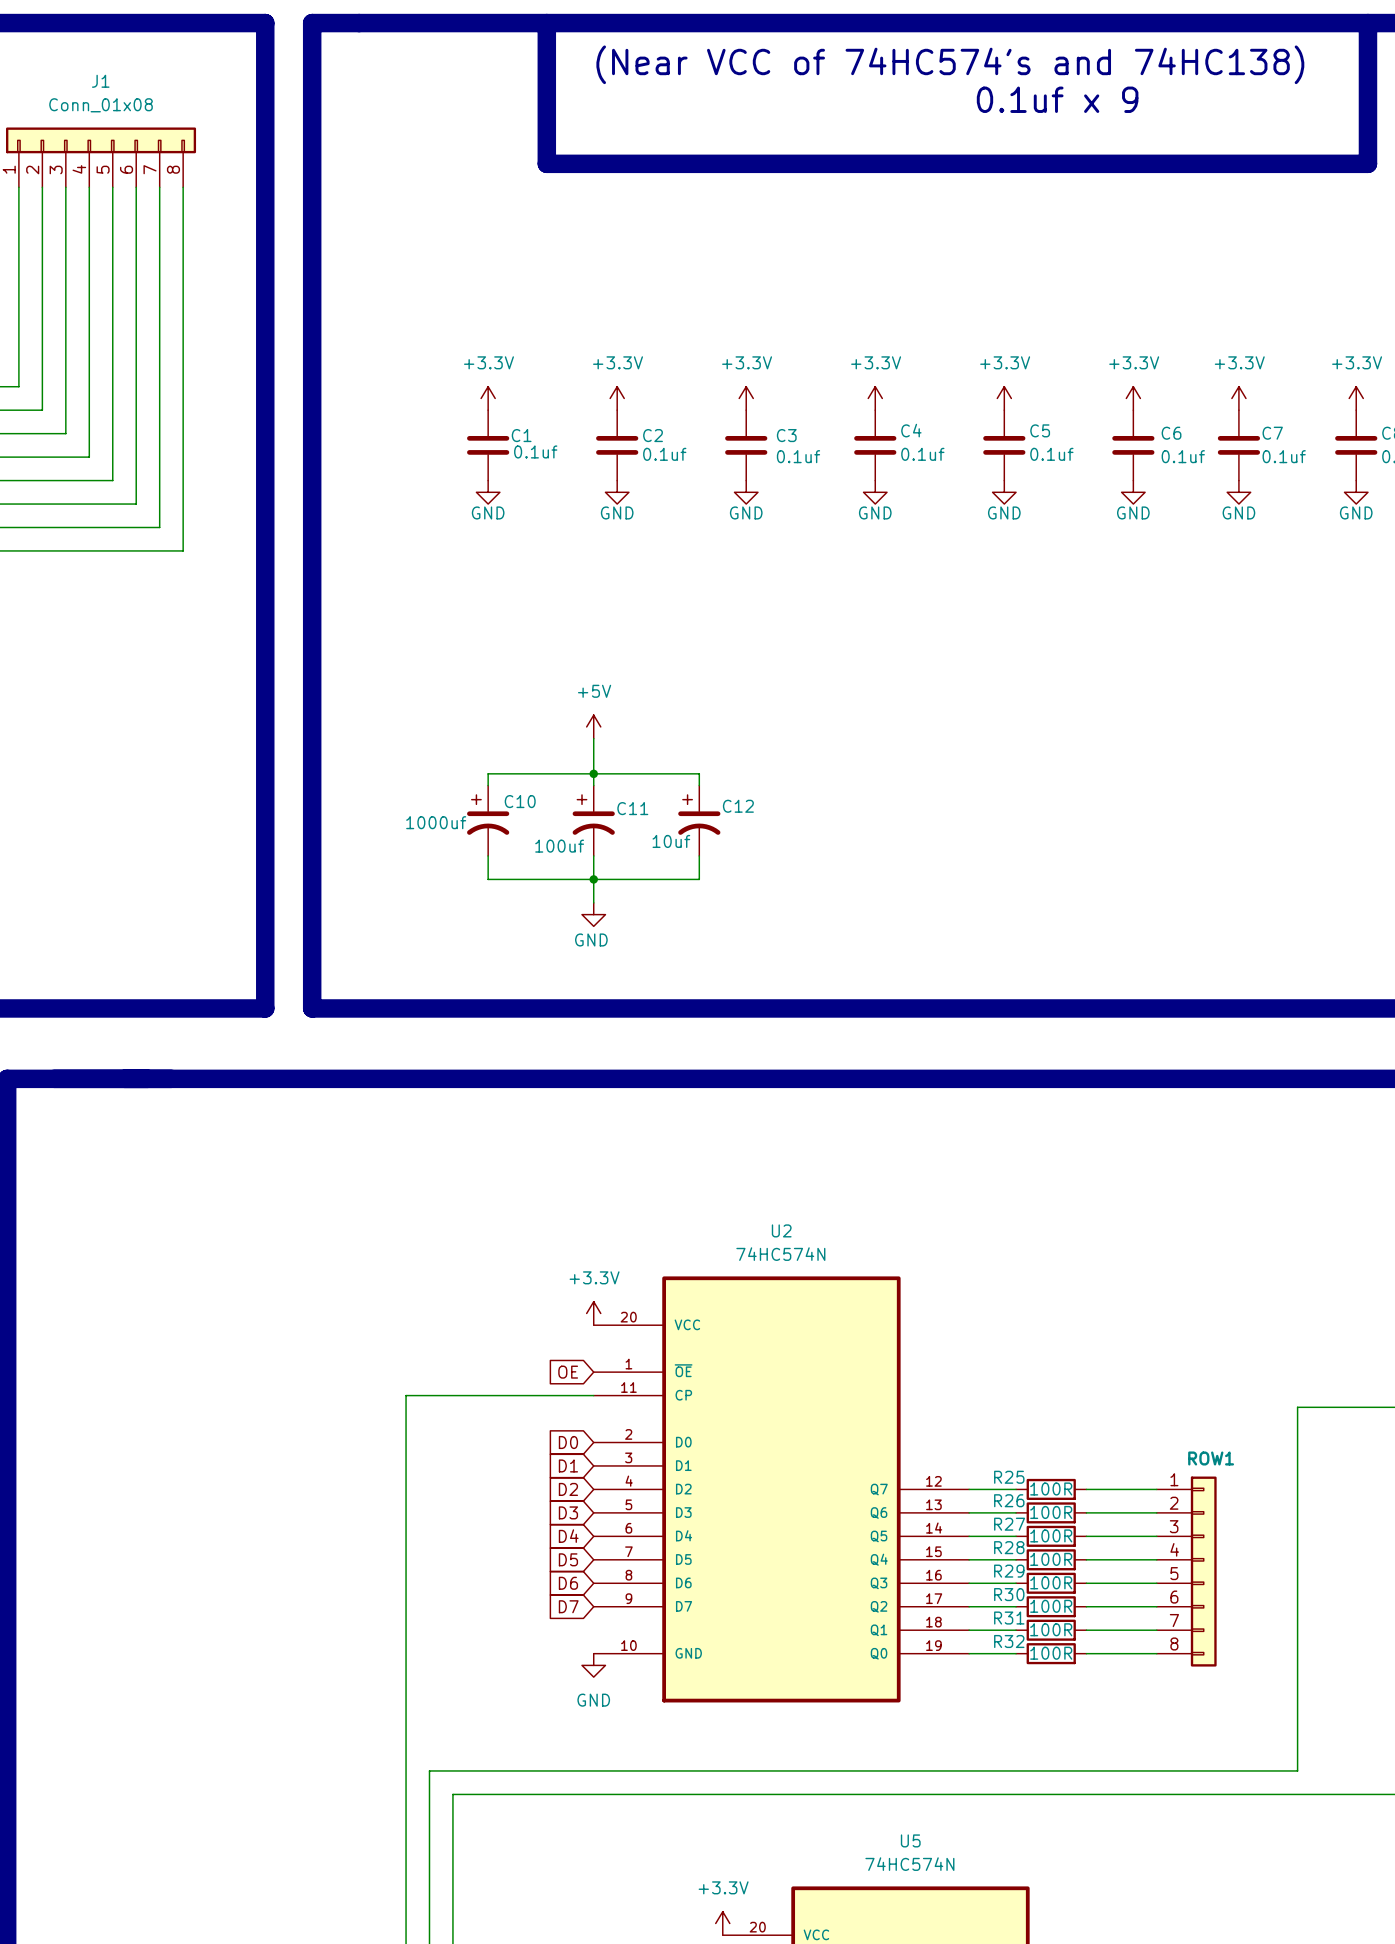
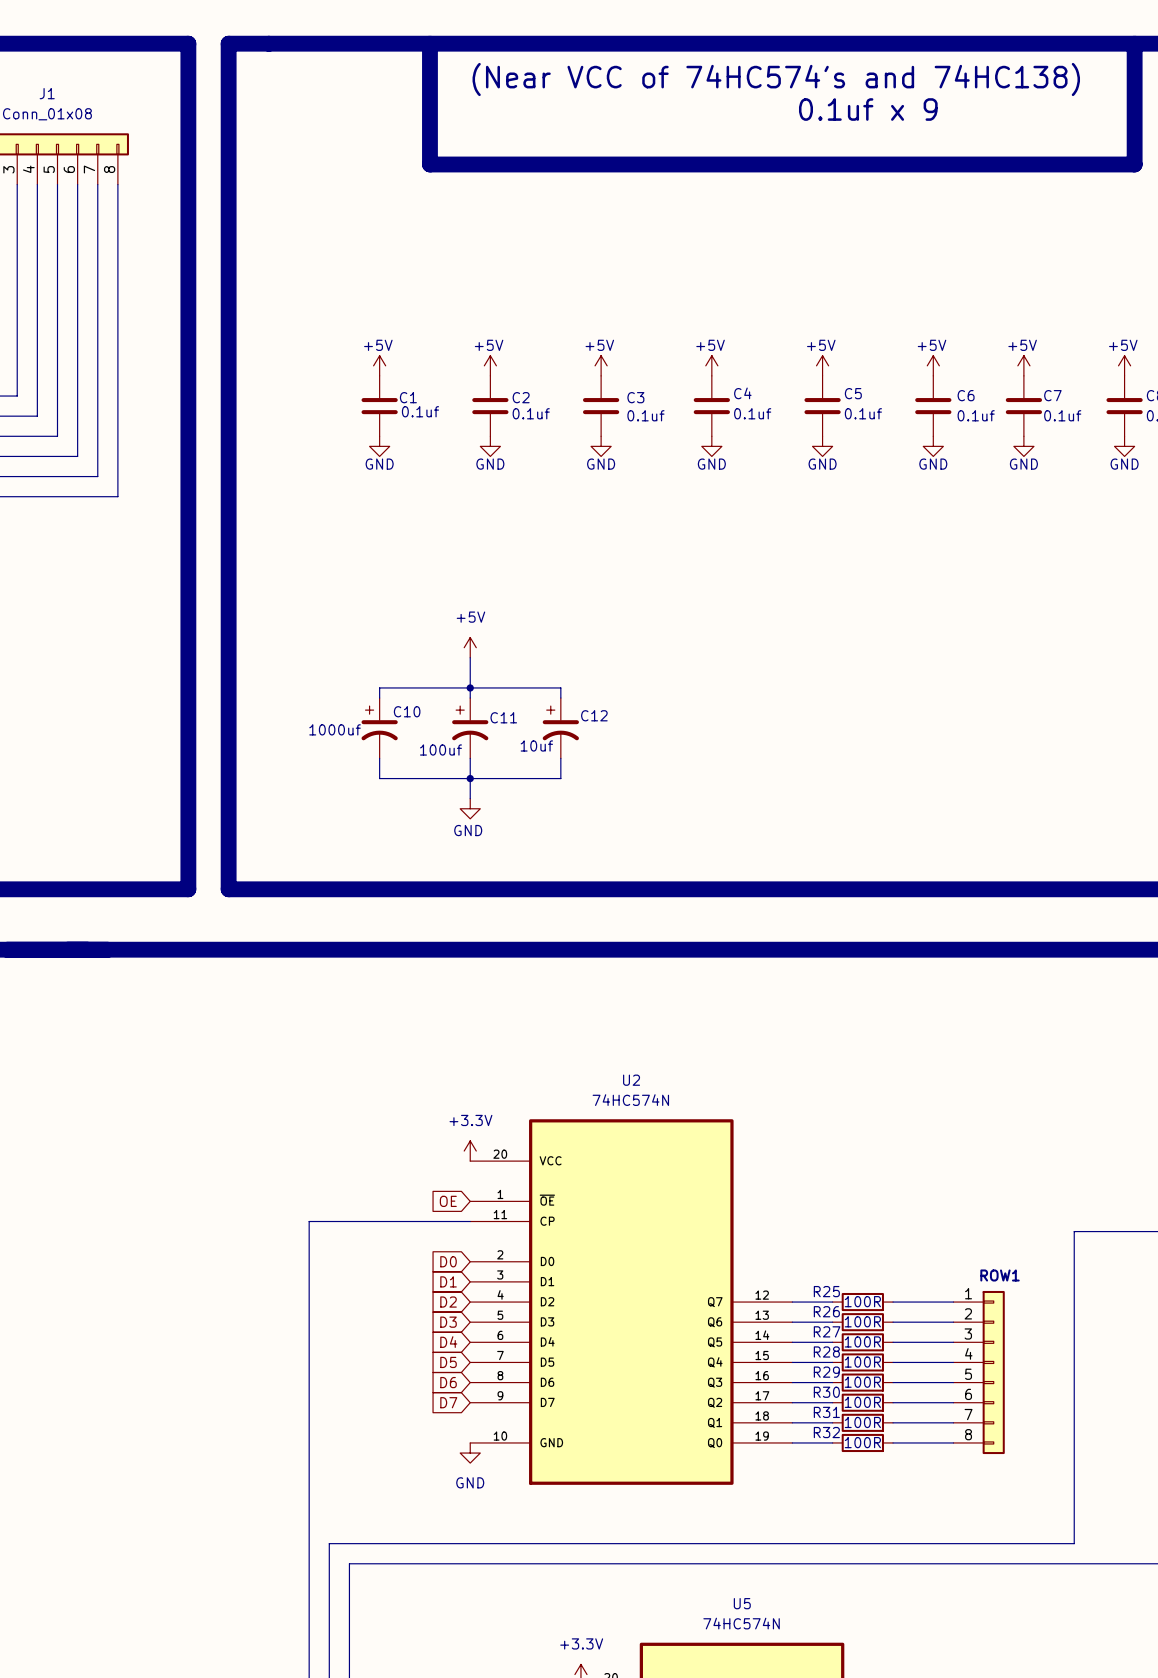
power symbol: +3.3V (488, 398) -> +5V (379, 365)
power symbol: +3.3V (617, 398) -> +5V (490, 365)
power symbol: +3.3V (746, 398) -> +5V (601, 365)
power symbol: +3.3V (875, 398) -> +5V (711, 365)
power symbol: +3.3V (1004, 398) -> +5V (822, 365)
power symbol: +3.3V (1133, 398) -> +5V (933, 365)
power symbol: +3.3V (1238, 398) -> +5V (1023, 365)
power symbol: +3.3V (1356, 398) -> +5V (1124, 365)

